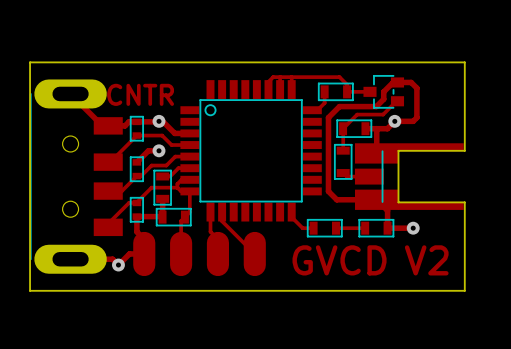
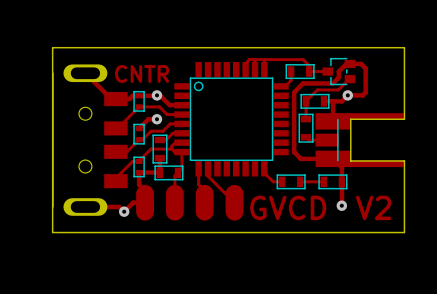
part footprint: [29, 79, 123, 274] -> [52, 64, 128, 216]
track: (387, 228) (413, 228) -> (341, 181) (341, 205)
via position: (413, 228) -> (341, 205)
text position: GVCD (339, 260) -> GVCD (288, 207)

